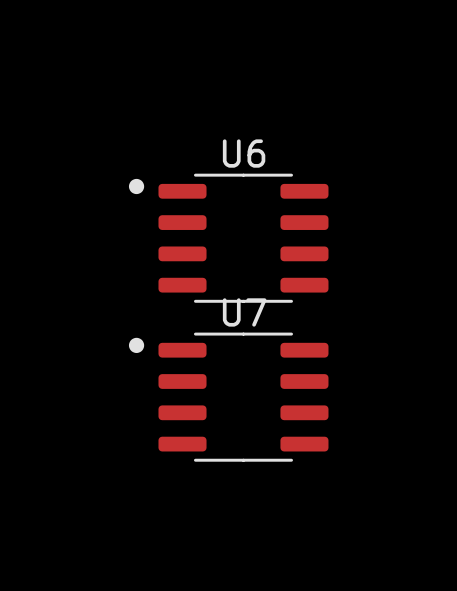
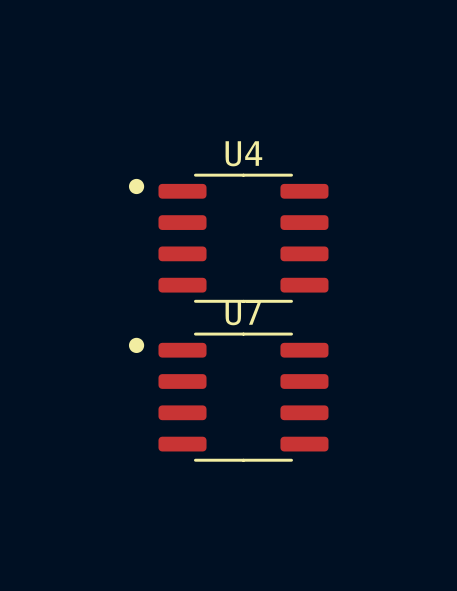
U6 name: U6 (244, 153) -> U4 (243, 153)

